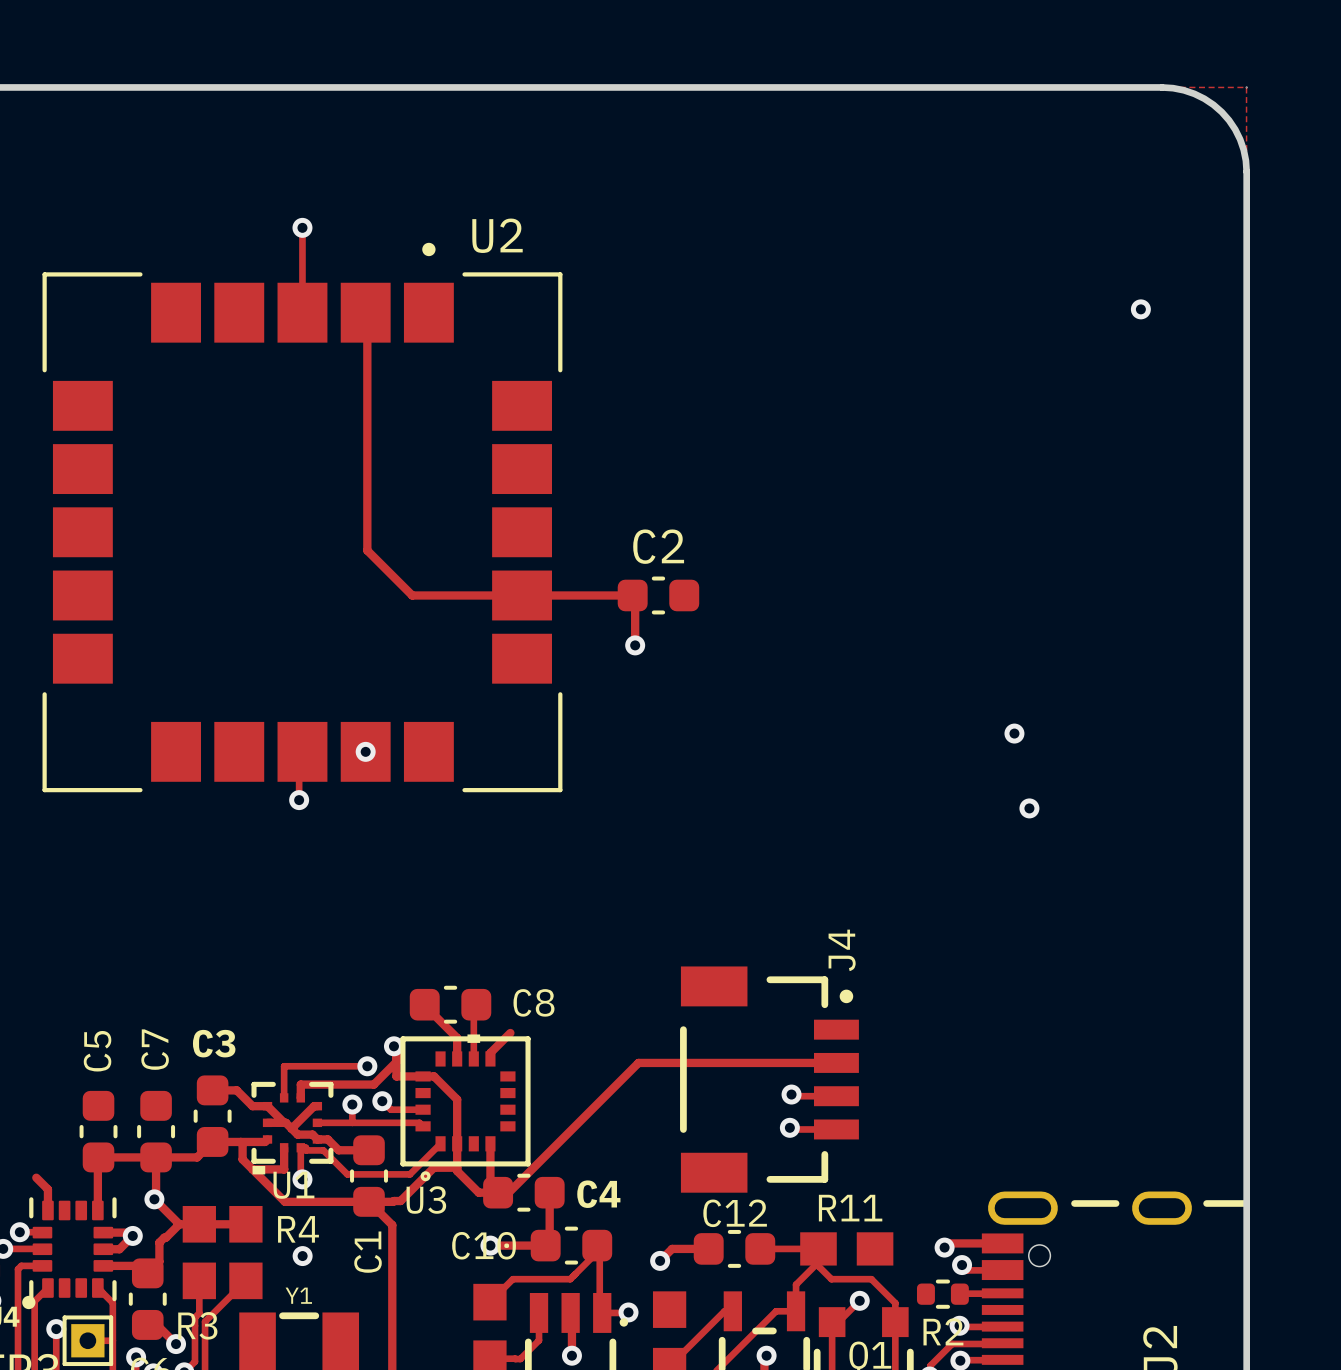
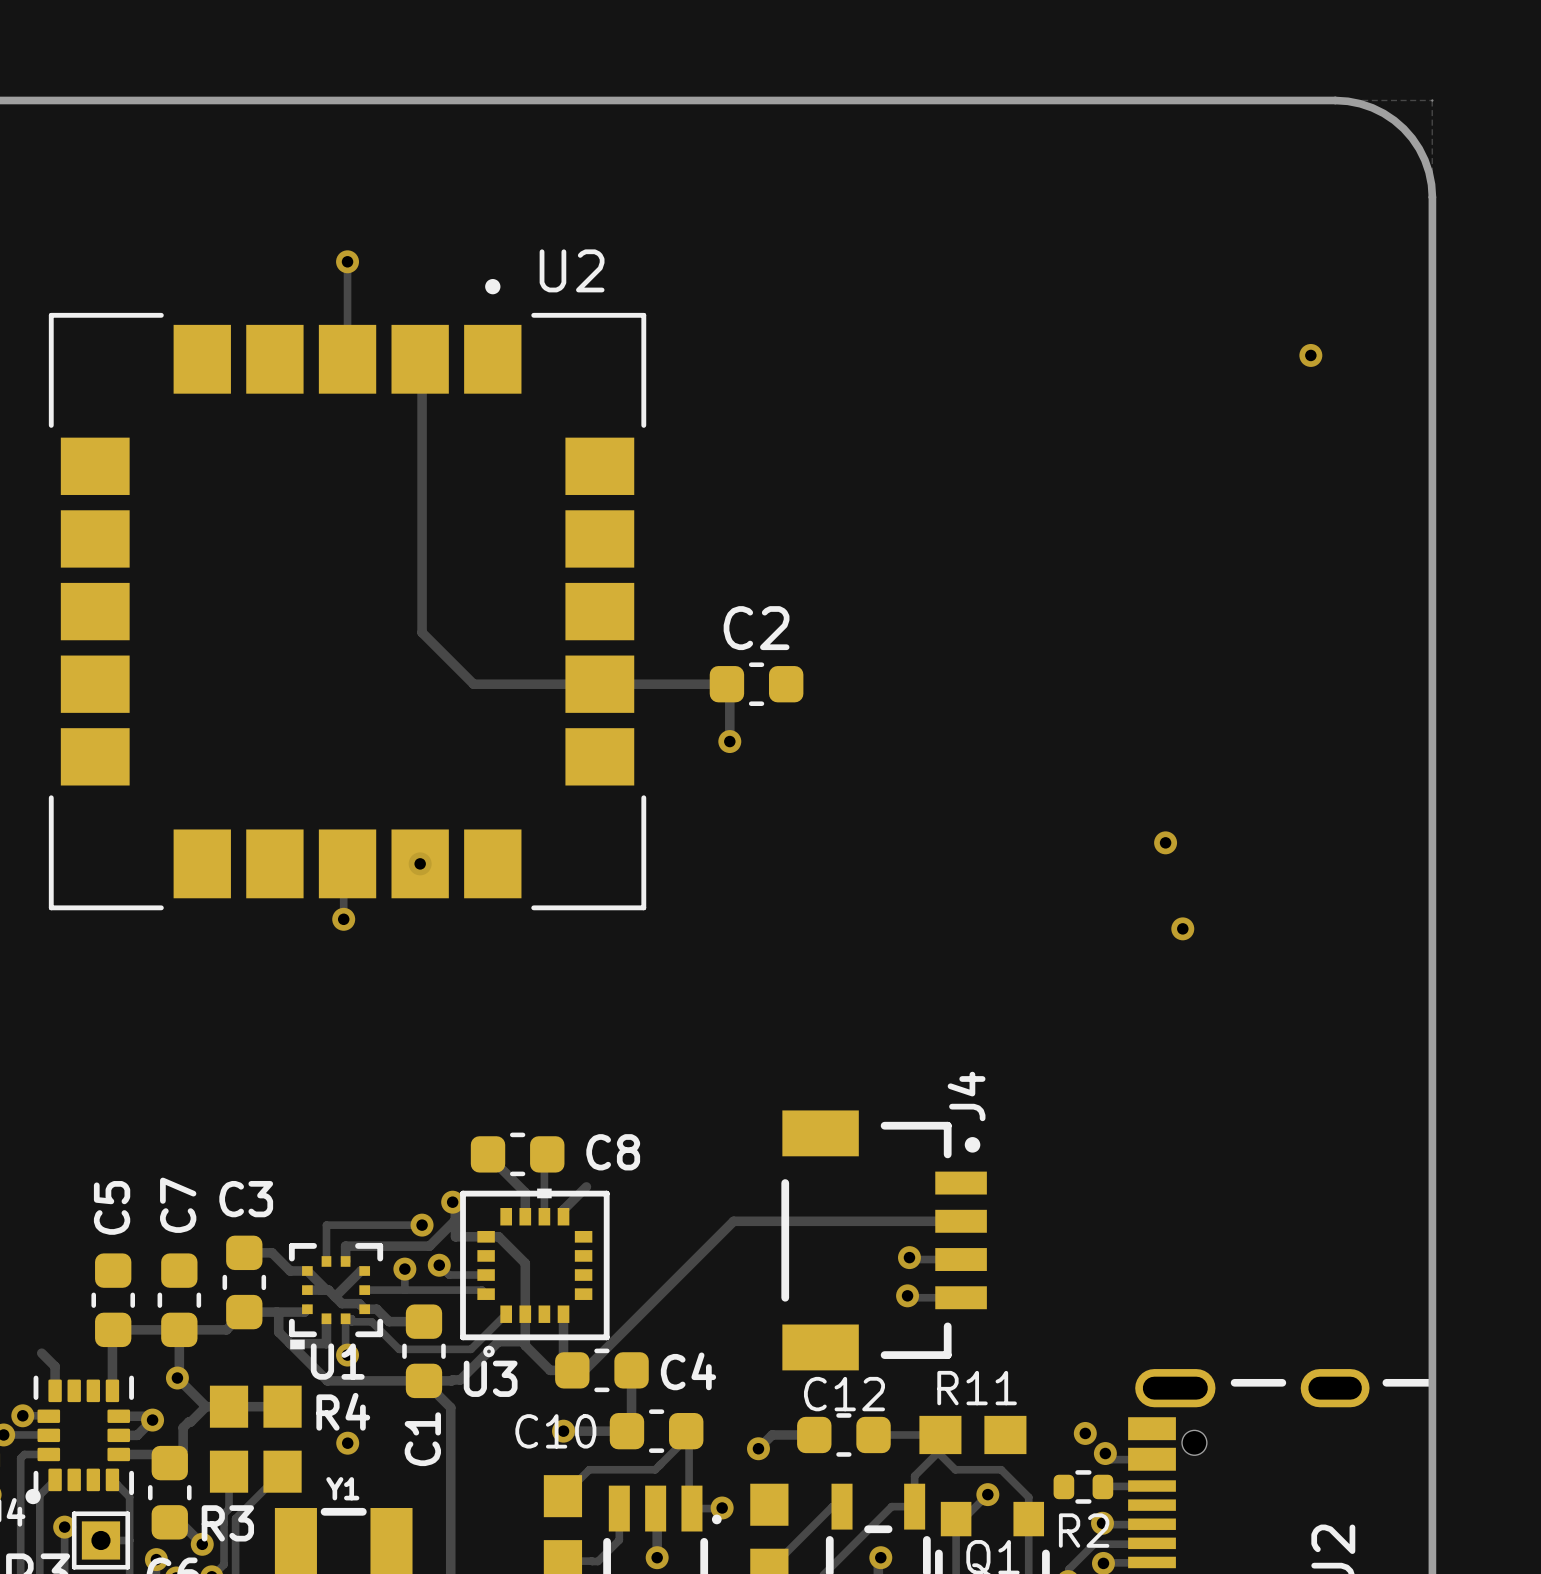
track: (1009, 1243) (948, 1243) (944, 1247) -> none

